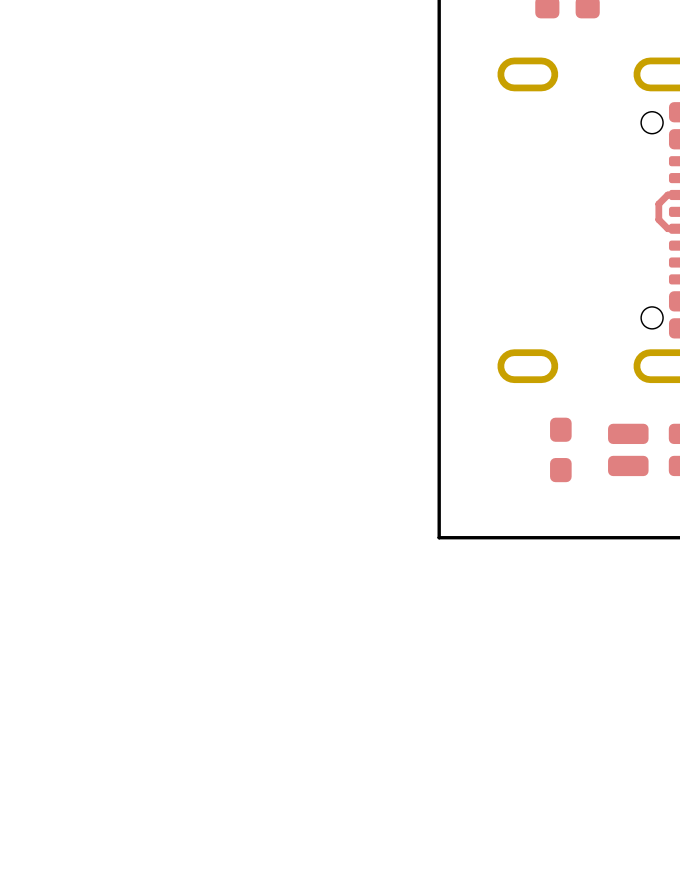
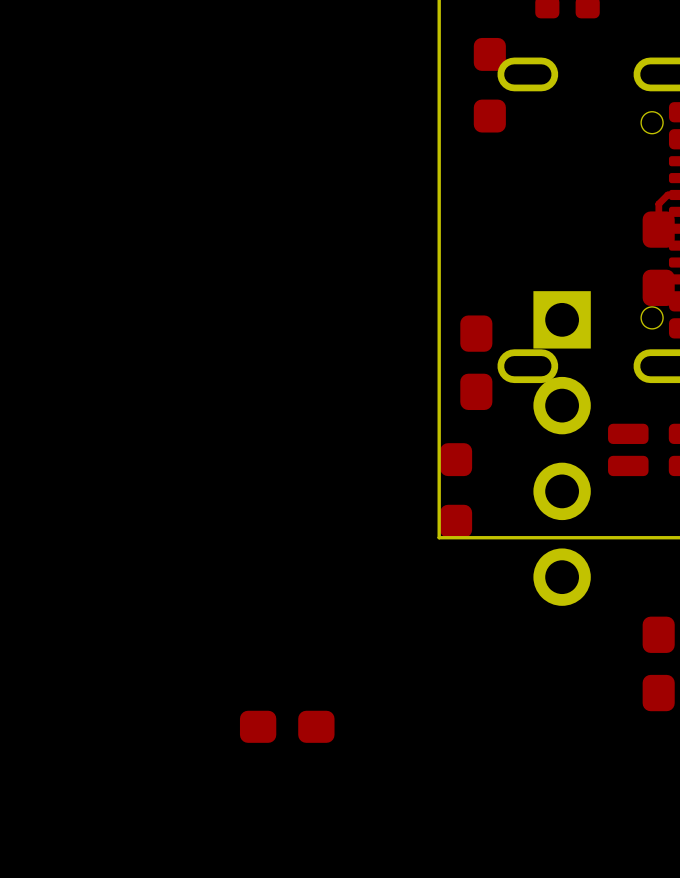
part: none -> (489, 85)
part: none -> (658, 258)
part: none -> (476, 362)
part footprint: [550, 417, 572, 483] -> [533, 291, 591, 606]
part: none -> (456, 490)
part: none -> (658, 663)
part: none -> (287, 726)

